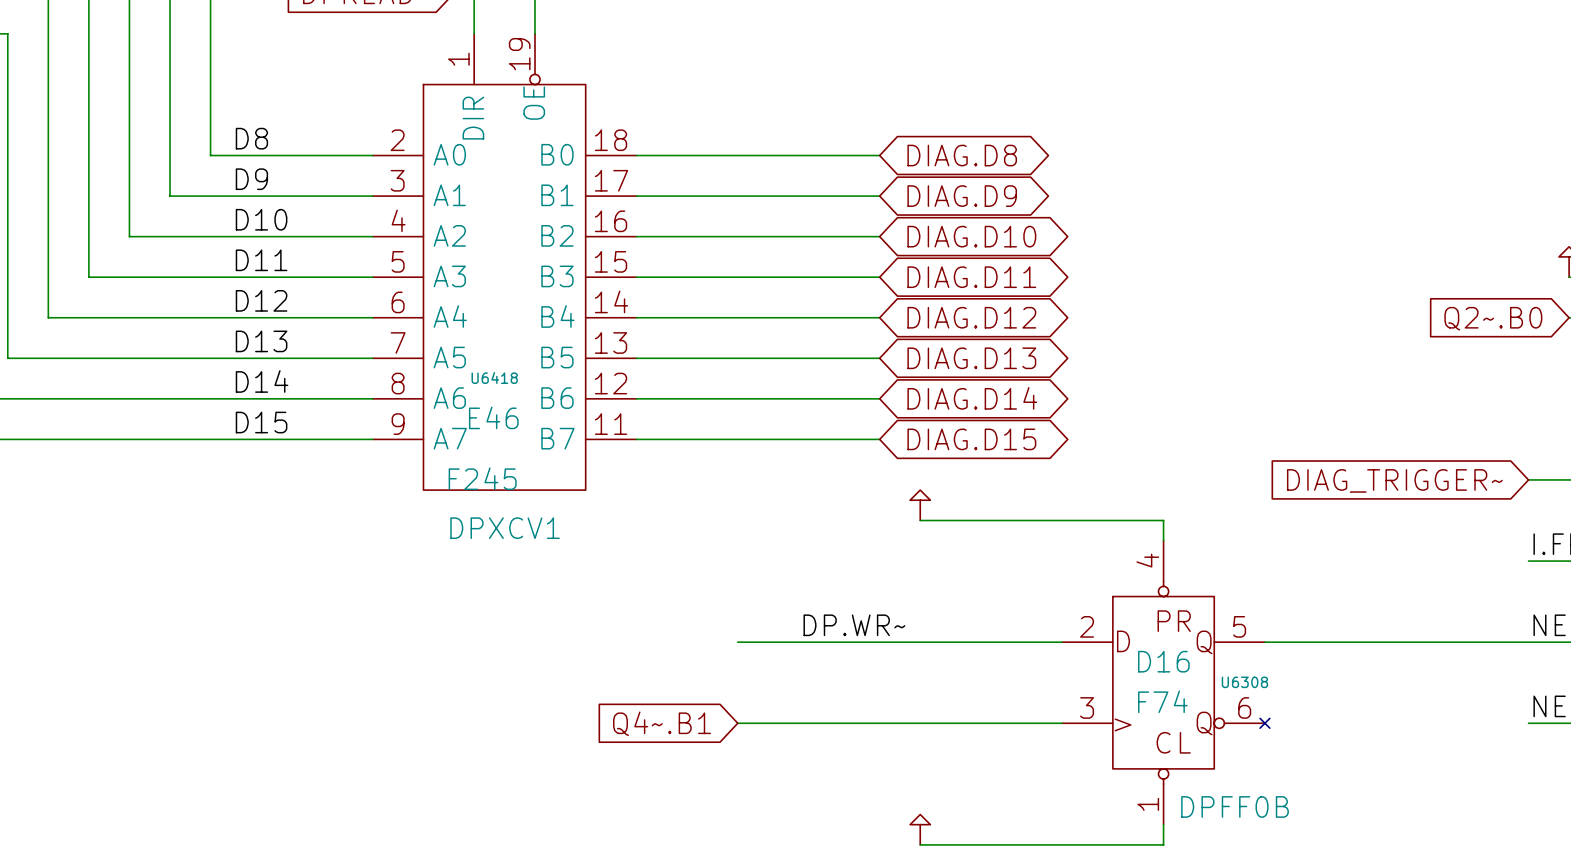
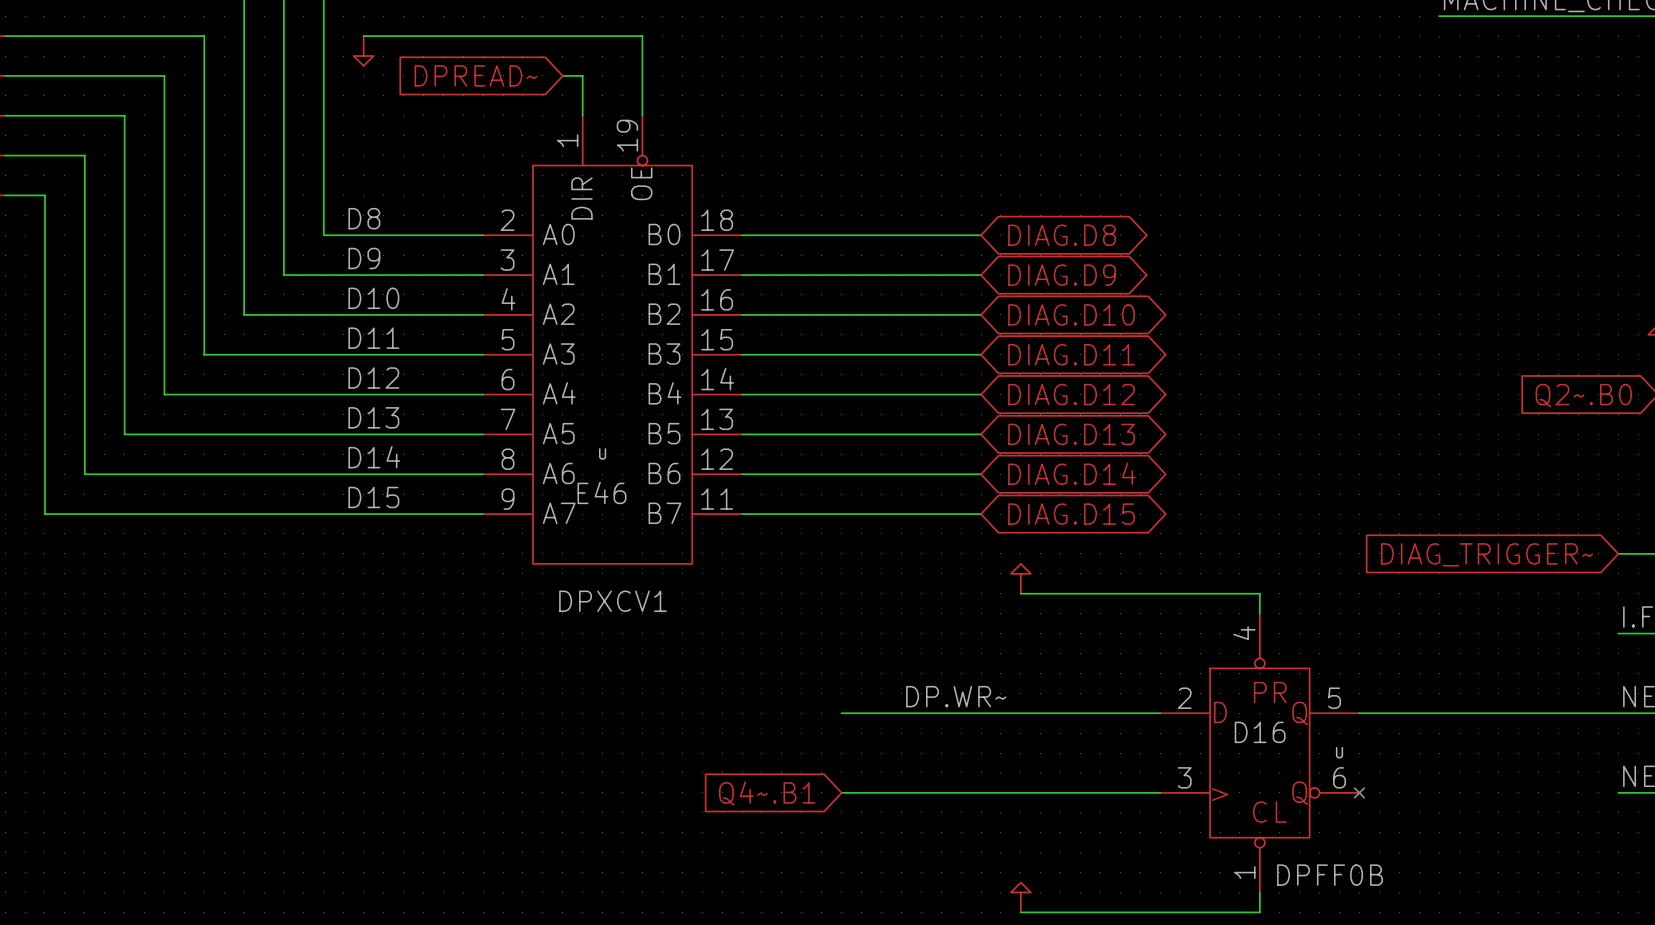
U6418 name: U6418 (494, 377) -> U (602, 453)
U6418 value: F245 (482, 478) -> none
U6308 name: U6308 (1244, 682) -> U (1339, 752)
U6308 value: F74 (1162, 701) -> none

